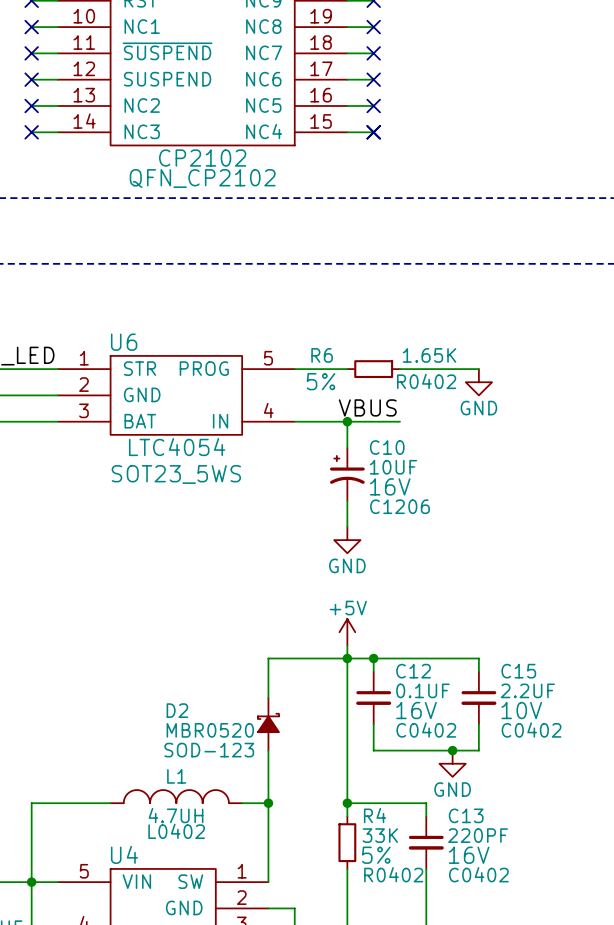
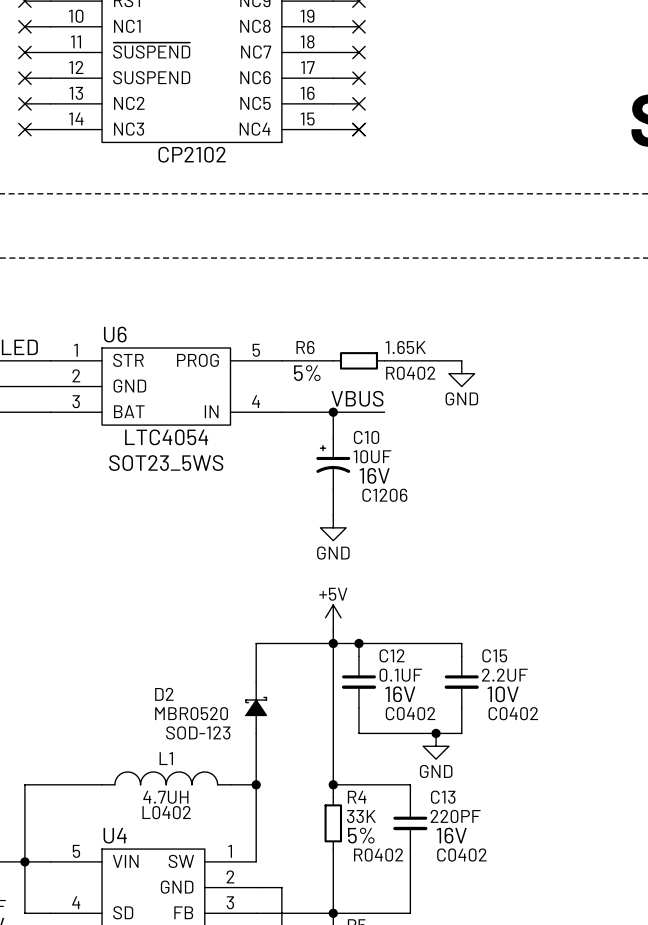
part text: QFN_CP2102 (202, 178) -> none

